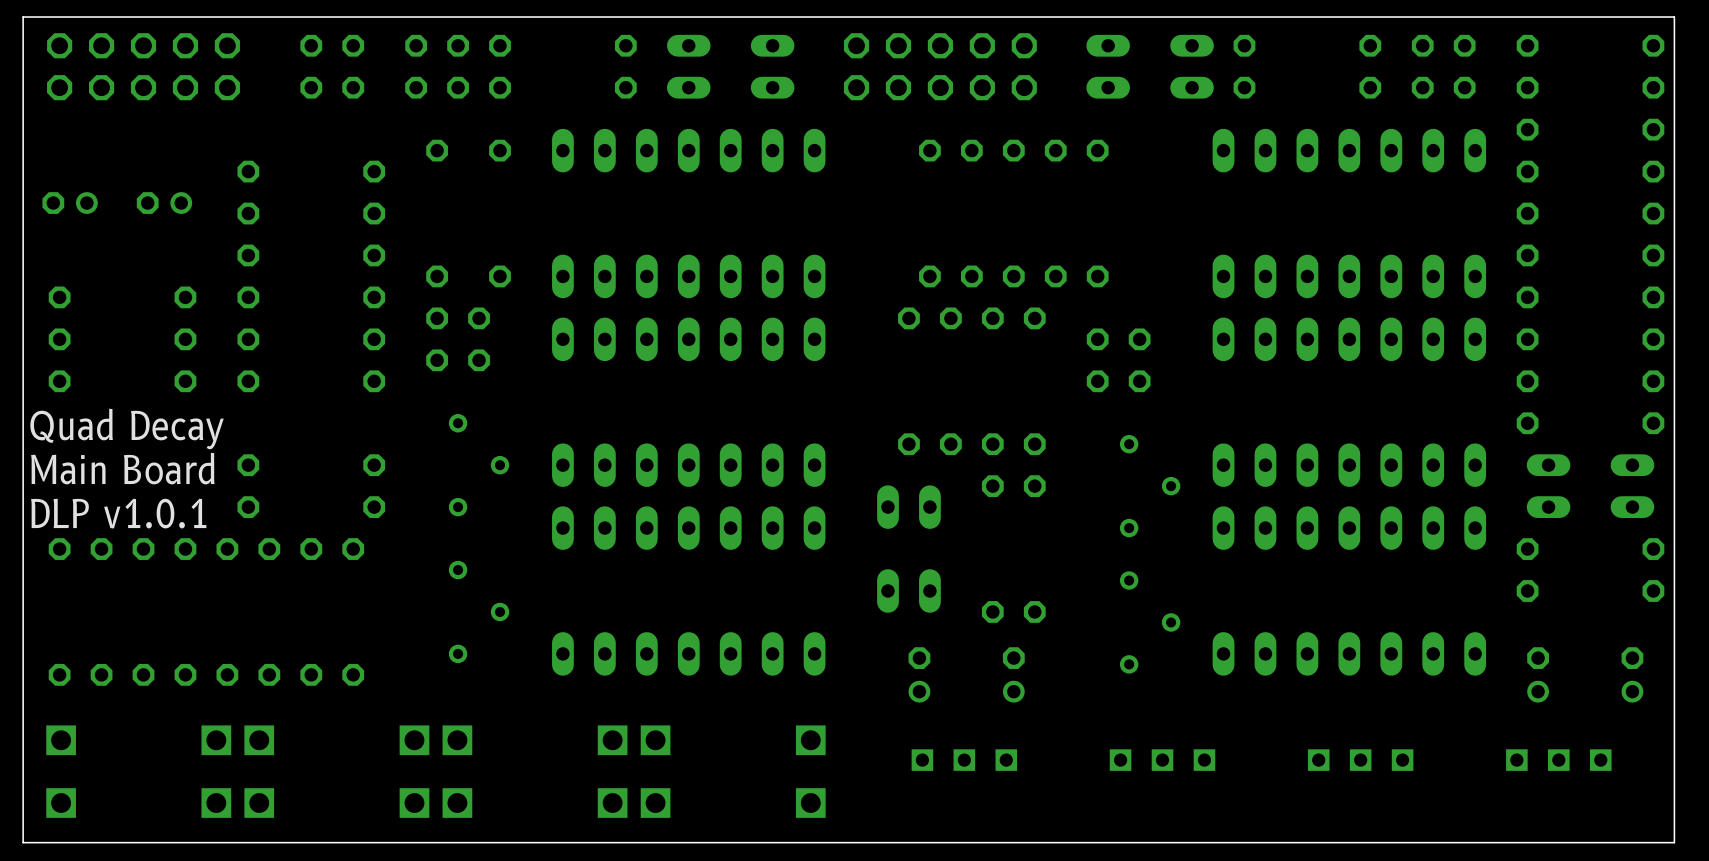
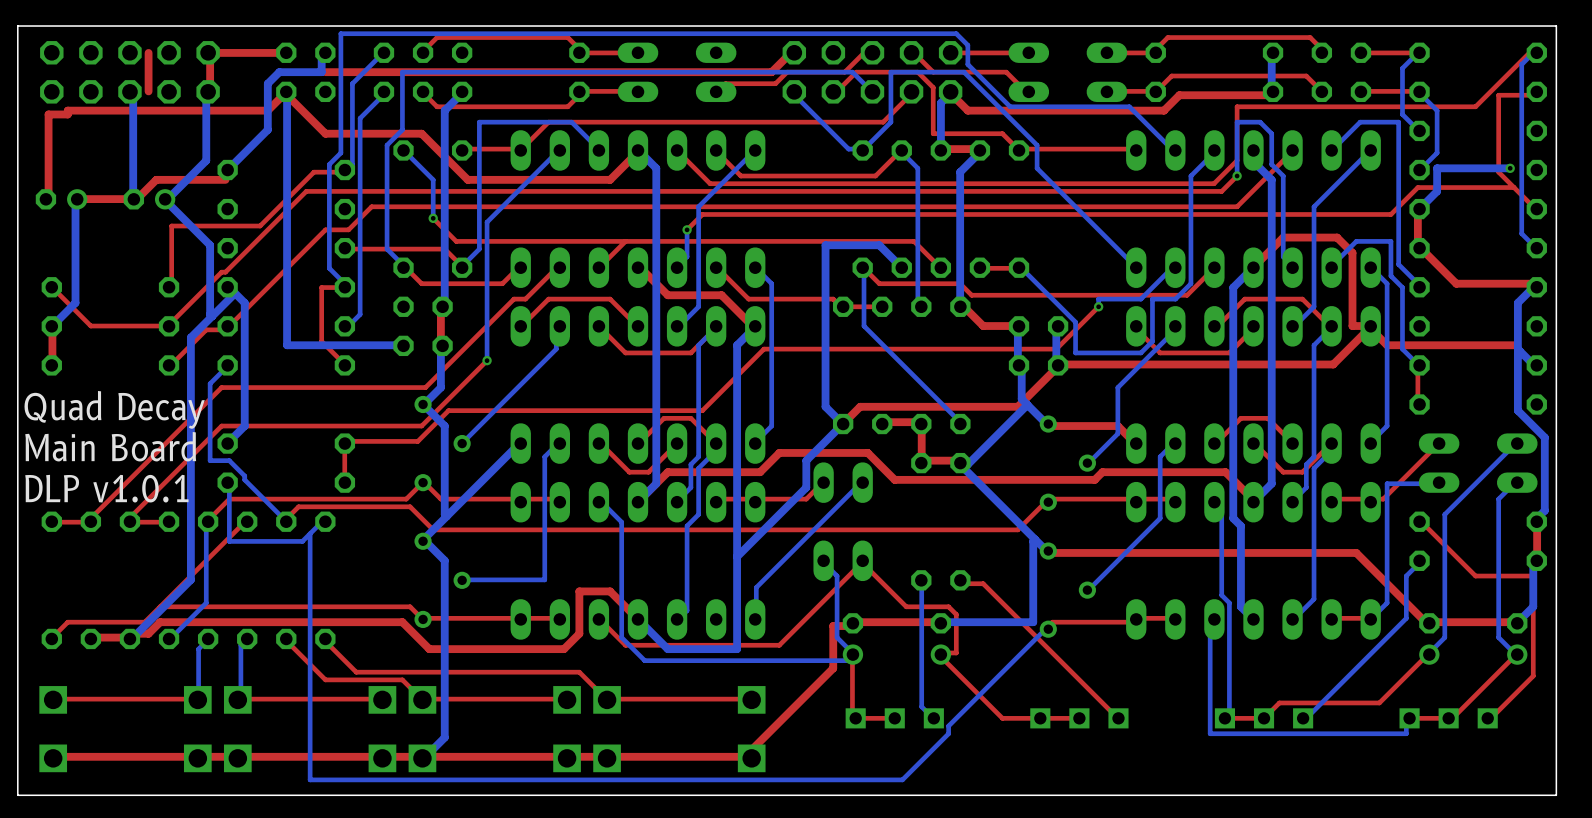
top track: none -> (148, 52) (148, 91)
top track: none -> (286, 52) (208, 52) (210, 56) (210, 91) (208, 91)
bottom track: none -> (325, 52) (321, 52) (321, 72) (279, 72) (267, 83) (267, 129) (227, 170)
bottom track: none -> (383, 52) (352, 83) (352, 164) (344, 170)
top track: none -> (637, 52) (579, 52) (579, 49) (567, 37) (437, 37) (423, 52)
top track: none -> (794, 52) (790, 52) (771, 72) (325, 72)
top track: none -> (872, 52) (864, 52) (844, 72) (787, 72) (775, 83) (725, 83) (716, 91)
top track: none -> (911, 52) (914, 52) (933, 72) (1006, 72) (1025, 91) (1028, 91)
top track: none -> (1028, 52) (950, 52)
bottom track: none -> (1273, 52) (1273, 91)
top track: none -> (1321, 52) (1321, 49) (1310, 37) (1167, 37) (1156, 49) (1155, 52) (1106, 52)
top track: none -> (1419, 52) (1360, 52)
bottom track: none -> (1419, 52) (1402, 68) (1402, 114) (1419, 130)
top track: none -> (1536, 52) (1529, 52) (1475, 106) (1237, 106) (1237, 160) (1214, 183) (710, 183) (677, 150)
bottom track: none -> (1536, 52) (1533, 52) (1521, 64) (1521, 233) (1536, 248)
bottom track: none -> (129, 91) (133, 95) (133, 199)
bottom track: none -> (208, 91) (206, 95) (206, 160) (167, 199) (165, 199) (210, 245) (210, 314) (212, 316)
bottom track: none -> (286, 91) (287, 345) (403, 345)
bottom track: none -> (383, 91) (383, 95) (360, 118) (360, 314) (348, 326) (344, 326)
bottom track: none -> (462, 91) (444, 110) (444, 306) (442, 306)
top track: none -> (637, 91) (579, 91) (579, 95) (567, 106) (437, 106) (423, 91)
bottom track: none -> (794, 91) (794, 95) (848, 149) (862, 150) (890, 122) (890, 72) (964, 72) (1037, 145) (1037, 168) (1136, 267)
top track: none -> (833, 91) (837, 91) (856, 72) (917, 72) (933, 87) (933, 133) (1002, 133) (1019, 150) (1136, 150)
bottom track: none -> (872, 91) (852, 72) (402, 72) (402, 129) (387, 145) (387, 249) (403, 267)
top track: none -> (911, 91) (883, 122) (548, 122) (520, 150) (462, 150)
bottom track: none -> (950, 91) (940, 102) (940, 150)
top track: none -> (1273, 91) (1271, 95) (1179, 95) (1164, 110) (967, 110) (950, 91)
top track: none -> (1321, 91) (1306, 76) (1171, 76) (1155, 91) (1106, 91)
top track: none -> (1419, 91) (1360, 91)
bottom track: none -> (1419, 91) (1437, 110) (1437, 152) (1419, 170)
top track: none -> (1536, 91) (1533, 95) (1498, 95) (1498, 172) (1536, 209)
bottom track: none -> (403, 150) (433, 179) (433, 218)
bottom track: none -> (559, 150) (487, 222) (487, 360)
bottom track: none -> (598, 150) (571, 122) (479, 122) (479, 249) (462, 267)
top track: none -> (637, 150) (610, 179) (467, 179) (421, 133) (325, 133) (287, 95) (286, 91) (267, 110) (67, 110) (67, 114) (48, 114) (48, 199) (45, 199)
bottom track: none -> (637, 150) (656, 168) (656, 483) (637, 502)
bottom track: none -> (755, 150) (698, 206) (698, 306) (677, 326)
top track: none -> (901, 150) (875, 176) (740, 176) (716, 150)
bottom track: none -> (901, 150) (917, 168) (917, 306) (921, 306)
top track: none -> (979, 150) (940, 150)
bottom track: none -> (979, 150) (960, 172) (960, 306)
bottom track: none -> (1175, 150) (1129, 106) (1010, 106) (967, 64) (967, 45) (956, 33) (340, 33) (340, 152) (329, 164) (329, 268) (344, 283) (344, 287)
bottom track: none -> (1214, 150) (1190, 176) (1190, 283) (1175, 299) (1152, 299) (1152, 341) (1140, 352) (1075, 352) (1075, 322) (1019, 267)
bottom track: none -> (1253, 150) (1256, 152) (1256, 164) (1271, 179) (1271, 483) (1253, 502)
top track: none -> (1292, 150) (1237, 206) (371, 206) (348, 229) (325, 229) (225, 329) (206, 329) (169, 365)
bottom track: none -> (1331, 150) (1360, 122) (1398, 122) (1398, 264) (1419, 287)
bottom track: none -> (1370, 150) (1314, 206) (1314, 306) (1292, 326)
bottom track: none -> (1510, 168) (1437, 168) (1437, 191) (1419, 209)
via: none -> (1510, 168)
top track: none -> (344, 170) (344, 172) (313, 172) (260, 226) (171, 226) (171, 283) (169, 287)
top track: none -> (1237, 176) (1221, 191) (306, 191) (225, 272) (221, 272) (167, 326)
bottom track: none -> (1237, 176) (1237, 122) (1260, 122) (1271, 133) (1271, 164) (1283, 176) (1283, 256) (1292, 267)
via: none -> (1237, 176)
top track: none -> (225, 179) (156, 179) (137, 199) (77, 199)
top track: none -> (1514, 187) (1417, 187) (1390, 214) (702, 214) (687, 229)
bottom track: none -> (77, 199) (75, 202) (75, 302) (51, 326)
top track: none -> (1419, 209) (1417, 210) (1417, 245) (1456, 283) (1533, 283) (1536, 287)
top track: none -> (433, 218) (456, 241) (914, 241) (940, 267)
via: none -> (433, 218)
bottom track: none -> (687, 229) (687, 256) (677, 267)
via: none -> (687, 229)
top track: none -> (625, 241) (598, 267)
top track: none -> (344, 248) (444, 249) (462, 267)
top track: none -> (520, 267) (502, 283) (421, 283) (403, 267)
top track: none -> (559, 267) (556, 268) (525, 299) (513, 299) (425, 387) (221, 387) (90, 518) (90, 522) (51, 521)
top track: none -> (637, 267) (640, 268) (667, 295) (721, 295) (752, 326) (755, 326)
top track: none -> (716, 267) (748, 299) (833, 299) (840, 306) (882, 306)
bottom track: none -> (755, 267) (771, 283) (771, 426) (755, 443)
bottom track: none -> (862, 267) (864, 326) (960, 424)
bottom track: none -> (901, 267) (879, 245) (825, 245) (825, 406) (843, 424) (806, 460) (806, 487) (737, 556)
top track: none -> (1019, 267) (979, 267)
bottom track: none -> (1175, 267) (1171, 268) (1140, 299) (1098, 299) (1098, 306)
top track: none -> (1214, 267) (1187, 295) (971, 295) (960, 283) (879, 283) (862, 267)
top track: none -> (1253, 267) (1283, 237) (1337, 237) (1352, 252) (1352, 326) (1370, 326)
bottom track: none -> (1253, 267) (1233, 287) (1233, 518) (1240, 526) (1240, 606) (1253, 619)
bottom track: none -> (1331, 267) (1356, 241) (1390, 241) (1390, 276) (1402, 287) (1402, 349) (1419, 365)
bottom track: none -> (1370, 267) (1387, 283) (1387, 426) (1370, 443)
top track: none -> (51, 287) (90, 326) (167, 326)
top track: none -> (344, 287) (321, 287) (321, 341) (344, 365)
bottom track: none -> (1536, 287) (1533, 287) (1517, 302) (1517, 349) (1533, 364) (1536, 365)
top track: none -> (442, 306) (440, 306) (440, 345) (442, 345)
top track: none -> (960, 306) (964, 306) (983, 326) (1019, 326)
top track: none -> (1098, 306) (1056, 349) (764, 349) (702, 410) (448, 410) (417, 441) (348, 441) (344, 443) (344, 482)
via: none -> (1098, 306)
top track: none -> (51, 326) (51, 365)
bottom track: none -> (559, 326) (556, 329) (556, 349) (462, 443)
top track: none -> (637, 326) (610, 299) (548, 299) (520, 326)
top track: none -> (716, 326) (690, 352) (625, 352) (598, 326)
bottom track: none -> (716, 326) (698, 345) (698, 456) (690, 464) (690, 487) (677, 502)
bottom track: none -> (755, 326) (737, 345) (737, 649) (667, 649) (637, 619)
bottom track: none -> (1019, 326) (1017, 364) (1021, 368) (1021, 399) (1048, 424)
bottom track: none -> (1058, 326) (1056, 329) (1056, 364) (1058, 365)
bottom track: none -> (1175, 326) (1171, 329) (1171, 333) (1117, 387) (1117, 433) (1087, 463)
top track: none -> (1253, 326) (1252, 329) (1229, 352) (1160, 352) (1137, 329) (1136, 326)
top track: none -> (1331, 326) (1302, 299) (1244, 299) (1217, 326) (1214, 326)
bottom track: none -> (1331, 326) (1314, 345) (1314, 456) (1306, 464) (1306, 487) (1292, 502)
top track: none -> (1370, 326) (1371, 329) (1387, 345) (1514, 345)
top track: none -> (1370, 326) (1333, 364) (1060, 364) (1017, 406) (860, 406) (843, 424)
bottom track: none -> (442, 345) (440, 349) (440, 387) (423, 404) (444, 426) (444, 514) (446, 516)
bottom track: none -> (1519, 351) (1517, 352) (1517, 410) (1544, 437) (1544, 510) (1537, 518) (1536, 521)
top track: none -> (487, 360) (421, 426) (221, 426) (129, 518) (129, 521) (133, 522) (169, 521)
via: none -> (487, 360)
bottom track: none -> (227, 365) (210, 383) (210, 460) (229, 460) (244, 476) (244, 479) (286, 521)
top track: none -> (1419, 365) (1417, 368) (1417, 402) (1419, 404)
bottom track: none -> (1027, 404) (967, 464) (960, 463) (964, 464) (964, 468) (1048, 551)
top track: none -> (882, 424) (883, 422) (917, 422) (921, 426) (921, 463) (925, 460) (960, 460) (960, 463)
top track: none -> (1048, 424) (1048, 426) (1117, 426) (1136, 443)
bottom track: none -> (227, 443) (244, 426) (244, 302) (227, 287) (233, 295) (190, 337) (190, 579) (129, 638)
bottom track: none -> (520, 443) (423, 541) (425, 541) (444, 560) (444, 737) (422, 758)
bottom track: none -> (559, 443) (544, 456) (544, 579) (462, 580)
top track: none -> (677, 443) (648, 472) (629, 472) (598, 443)
top track: none -> (716, 443) (690, 418) (663, 418) (637, 443)
bottom track: none -> (716, 443) (714, 445) (714, 452) (698, 468) (698, 514) (687, 526) (687, 610) (677, 619)
bottom track: none -> (1175, 443) (1160, 456) (1160, 518) (1087, 590)
top track: none -> (1292, 443) (1267, 418) (1240, 418) (1214, 443)
top track: none -> (1331, 443) (1302, 472) (1283, 472) (1253, 443)
bottom track: none -> (1331, 443) (1329, 445) (1329, 452) (1314, 468) (1314, 599) (1292, 619)
top track: none -> (1439, 443) (1383, 499) (1371, 499) (1370, 502) (1367, 499) (1333, 499) (1331, 502)
bottom track: none -> (1517, 443) (1444, 514) (1444, 637) (1429, 654)
bottom track: none -> (227, 482) (229, 483) (229, 541) (302, 541) (321, 522) (325, 521)
top track: none -> (823, 482) (806, 499) (756, 499) (755, 502) (752, 499) (717, 499) (716, 502)
bottom track: none -> (862, 482) (756, 587) (755, 619)
bottom track: none -> (1439, 482) (1387, 483) (1387, 602) (1370, 619)
bottom track: none -> (1517, 482) (1498, 499) (1498, 637) (1517, 654)
top track: none -> (559, 502) (556, 499) (521, 499) (520, 502) (517, 499) (440, 499) (423, 482) (406, 499) (229, 499) (208, 521)
bottom track: none -> (598, 502) (602, 502) (621, 522) (621, 637) (644, 660) (852, 660) (852, 652) (837, 637) (837, 576) (823, 560)
top track: none -> (1175, 502) (1171, 499) (1137, 499) (1136, 502) (1133, 499) (1048, 499) (1048, 502) (1044, 502) (1017, 529) (433, 529) (410, 506) (298, 506) (287, 518) (286, 521)
bottom track: none -> (1214, 502) (1221, 506) (1221, 595) (1229, 602) (1229, 714) (1224, 718)
top track: none -> (1253, 502) (1225, 472) (1102, 472) (1094, 479) (894, 479) (867, 452) (779, 452) (760, 472) (667, 472) (637, 502)
bottom track: none -> (208, 521) (206, 522) (206, 602) (169, 638)
top track: none -> (247, 521) (144, 622) (67, 622) (51, 638)
top track: none -> (1419, 521) (1475, 576) (1533, 576) (1533, 676) (1490, 718) (1487, 718)
top track: none -> (1536, 521) (1536, 560)
bottom track: none -> (310, 533) (310, 779) (902, 779) (948, 733) (948, 726) (1044, 629) (1048, 629)
bottom track: none -> (1035, 539) (1033, 541) (1033, 622) (940, 623)
top track: none -> (1048, 551) (1048, 552) (1356, 552) (1425, 622) (1517, 623)
bottom track: none -> (1419, 560) (1406, 576) (1406, 618) (1306, 718) (1303, 718)
bottom track: none -> (1536, 560) (1533, 564) (1533, 606) (1517, 623)
bottom track: none -> (921, 580) (921, 706) (933, 718)
top track: none -> (960, 580) (964, 583) (983, 583) (1118, 718)
top track: none -> (160, 606) (410, 606) (423, 619) (559, 619)
top track: none -> (598, 619) (625, 645) (779, 645) (862, 560) (864, 564) (906, 606) (948, 606) (956, 614) (956, 652) (940, 652) (940, 656) (1002, 718) (1079, 718)
top track: none -> (637, 619) (610, 591) (579, 591) (579, 633) (563, 649) (429, 649) (402, 622) (160, 622) (148, 633) (137, 633) (129, 638) (90, 638)
top track: none -> (1175, 619) (1137, 618) (1133, 622) (1052, 622) (1048, 629)
bottom track: none -> (1214, 619) (1210, 626) (1210, 733) (1406, 733) (1406, 718) (1409, 718)
top track: none -> (1370, 619) (1331, 619)
top track: none -> (940, 623) (856, 622) (852, 623) (852, 626) (833, 626) (833, 668) (748, 752) (751, 758) (748, 756) (610, 756) (607, 758) (606, 756) (567, 756) (567, 758) (563, 756) (425, 756) (422, 758) (421, 756) (383, 756) (382, 758) (379, 756) (240, 756) (237, 758) (237, 756) (198, 756) (197, 758) (194, 756) (56, 756) (53, 758)
bottom track: none -> (208, 638) (198, 649) (197, 699)
bottom track: none -> (247, 638) (240, 645) (240, 699) (237, 699)
top track: none -> (286, 638) (325, 679) (402, 679) (422, 699) (567, 699)
top track: none -> (325, 638) (325, 641) (356, 672) (579, 672) (607, 699) (751, 699)
top track: none -> (852, 654) (852, 718) (894, 718)
top track: none -> (1429, 654) (1379, 702) (1279, 702) (1264, 718) (1224, 718)
top track: none -> (1517, 654) (1452, 718) (1409, 718)
top track: none -> (197, 699) (53, 699)
top track: none -> (382, 699) (237, 699)

